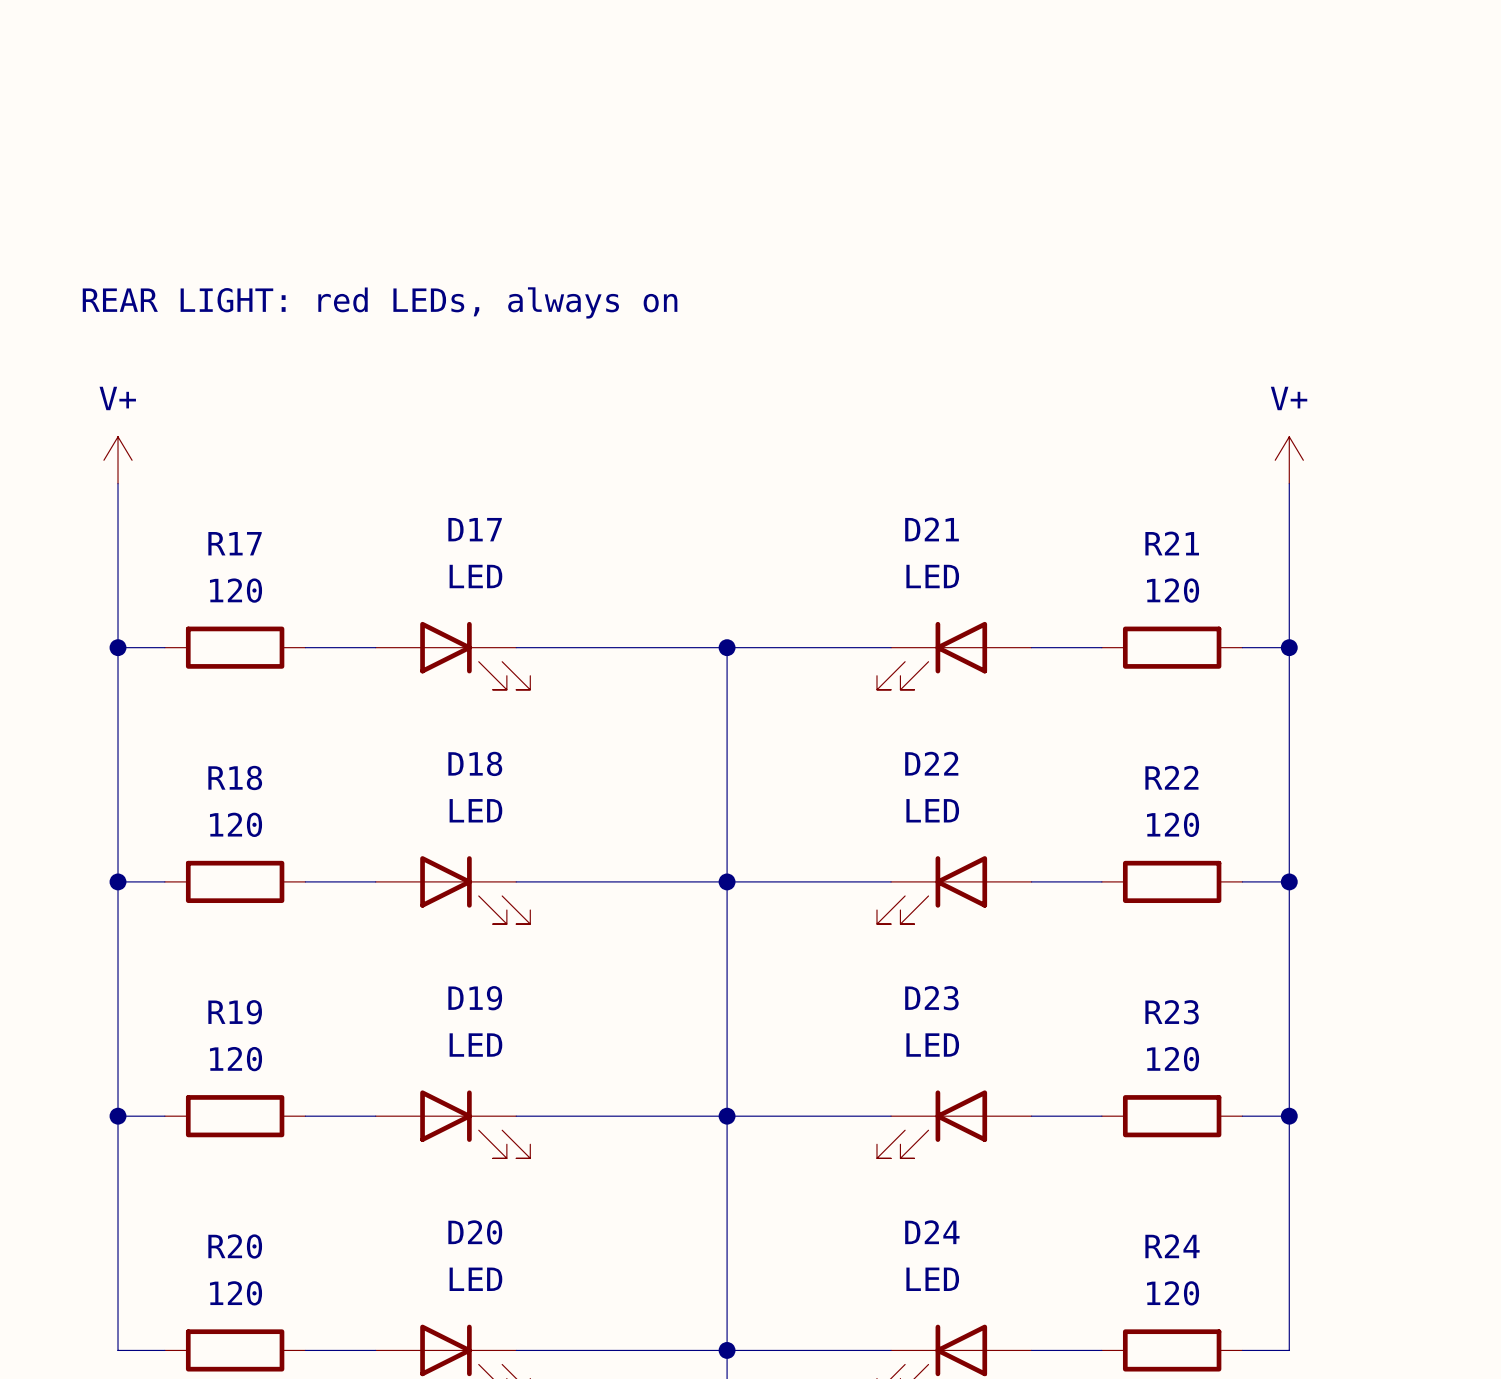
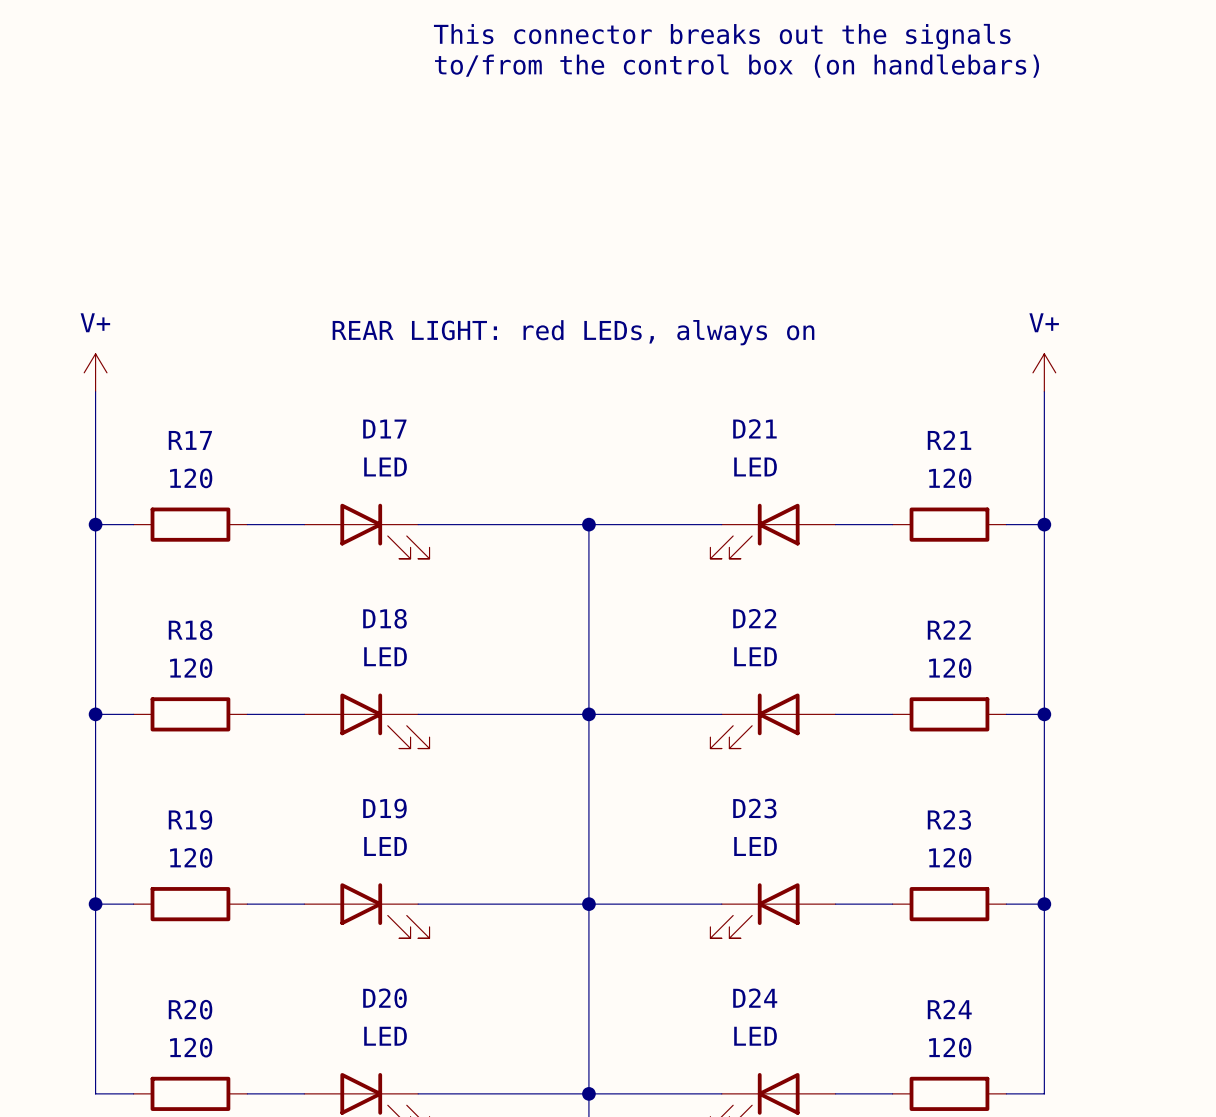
text: none -> This connector breaks out the signals (722, 36)
text: none -> to/from the control box (on handlebars) (737, 66)
text position: REAR LIGHT: red LEDs, always on (380, 302) -> REAR LIGHT: red LEDs, always on (573, 332)

